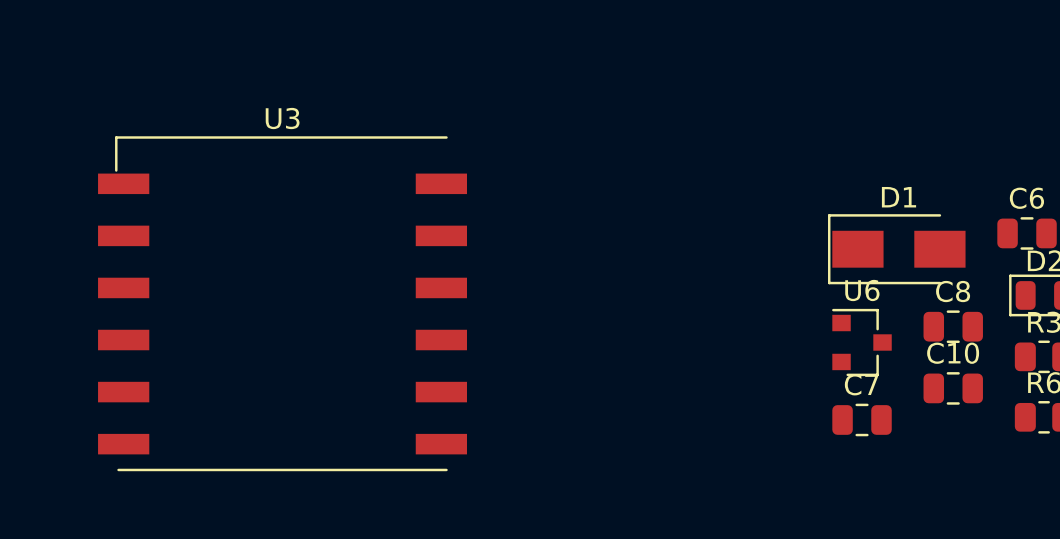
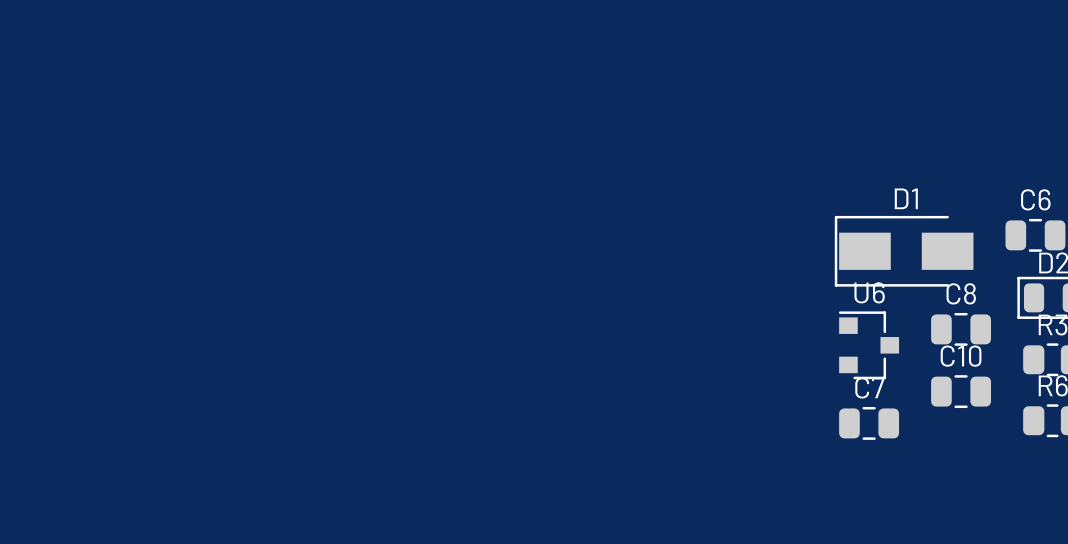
U3: (282, 303) -> none

